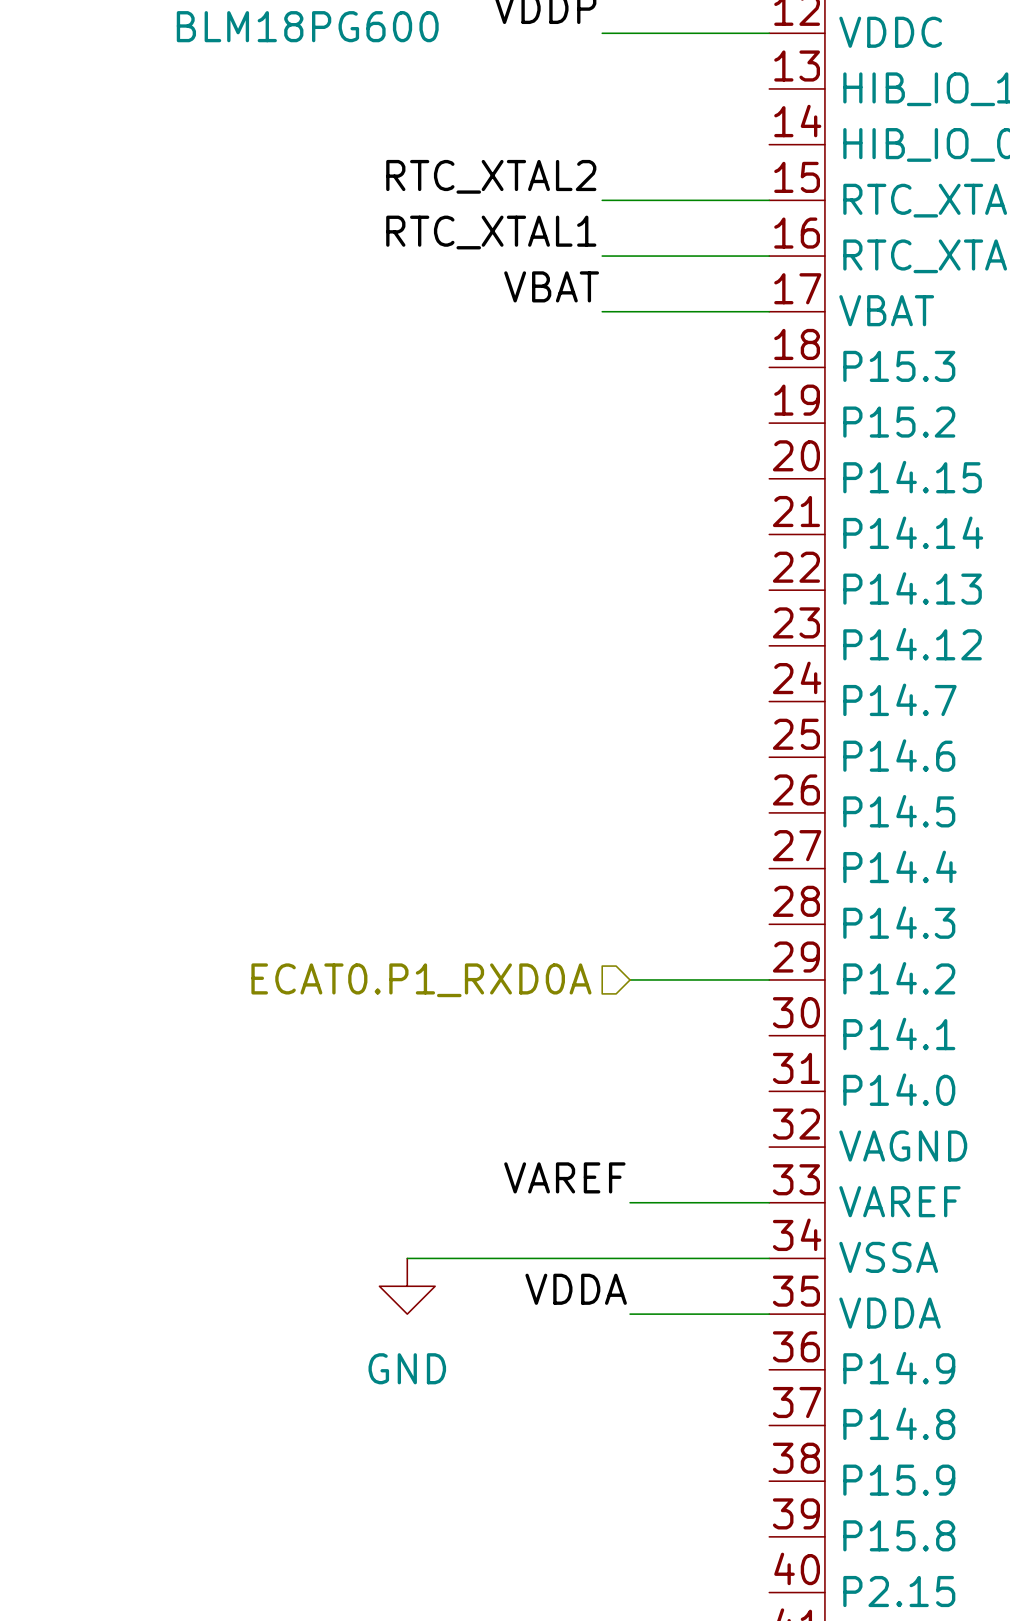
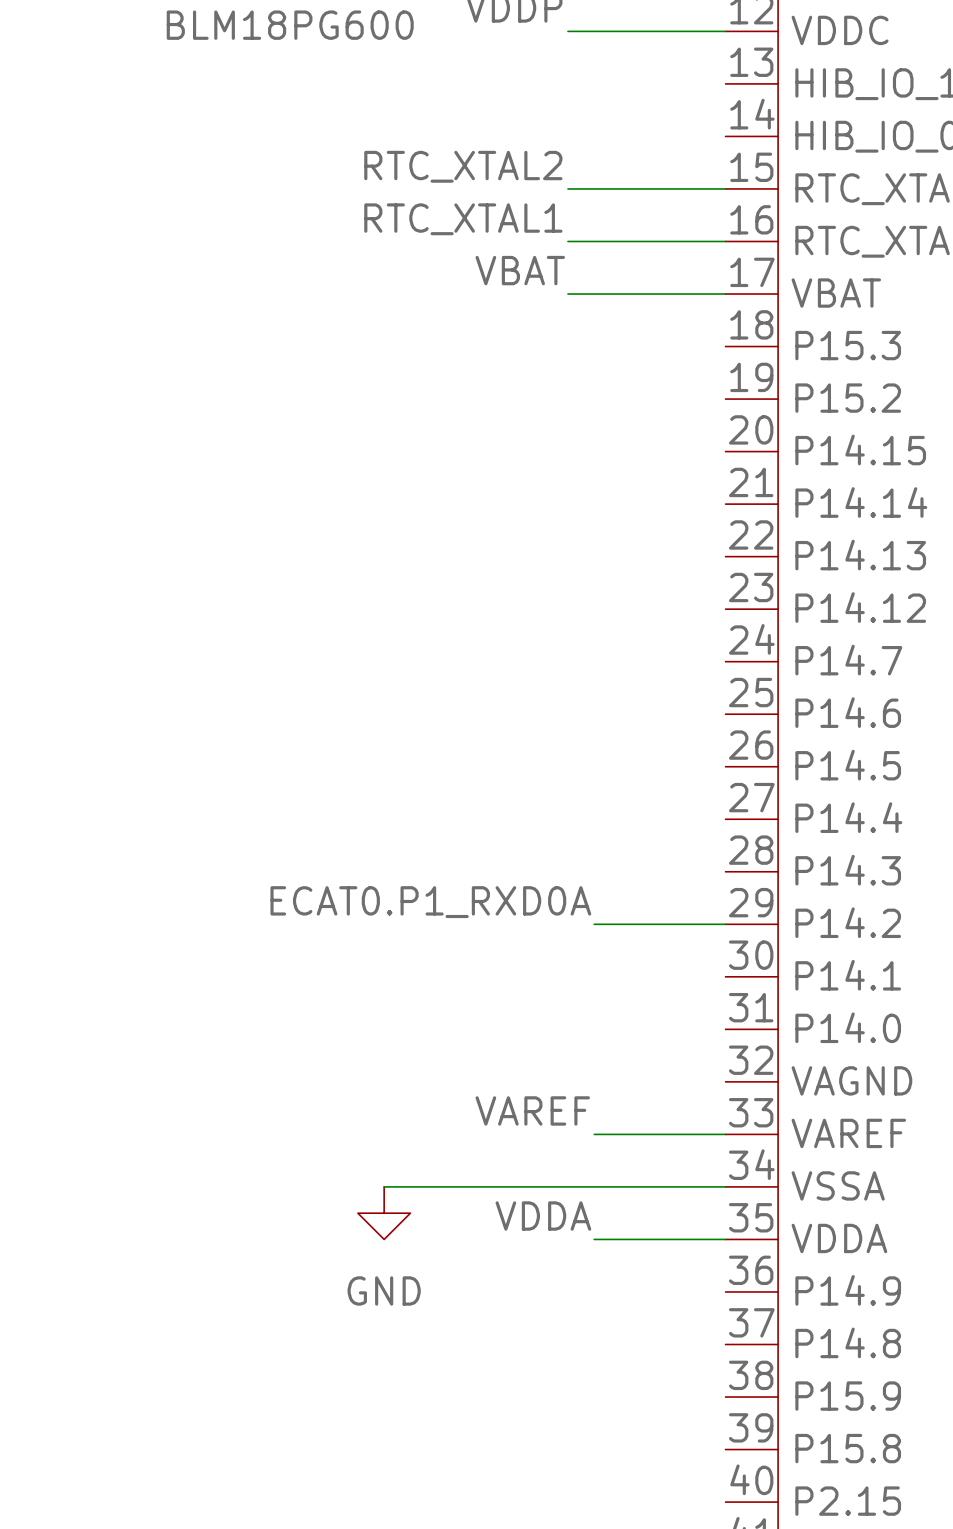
label: none -> ECAT0.P1_RXD0A (430, 902)
hierarchical label: ECAT0.P1_RXD0A (421, 980) -> none

